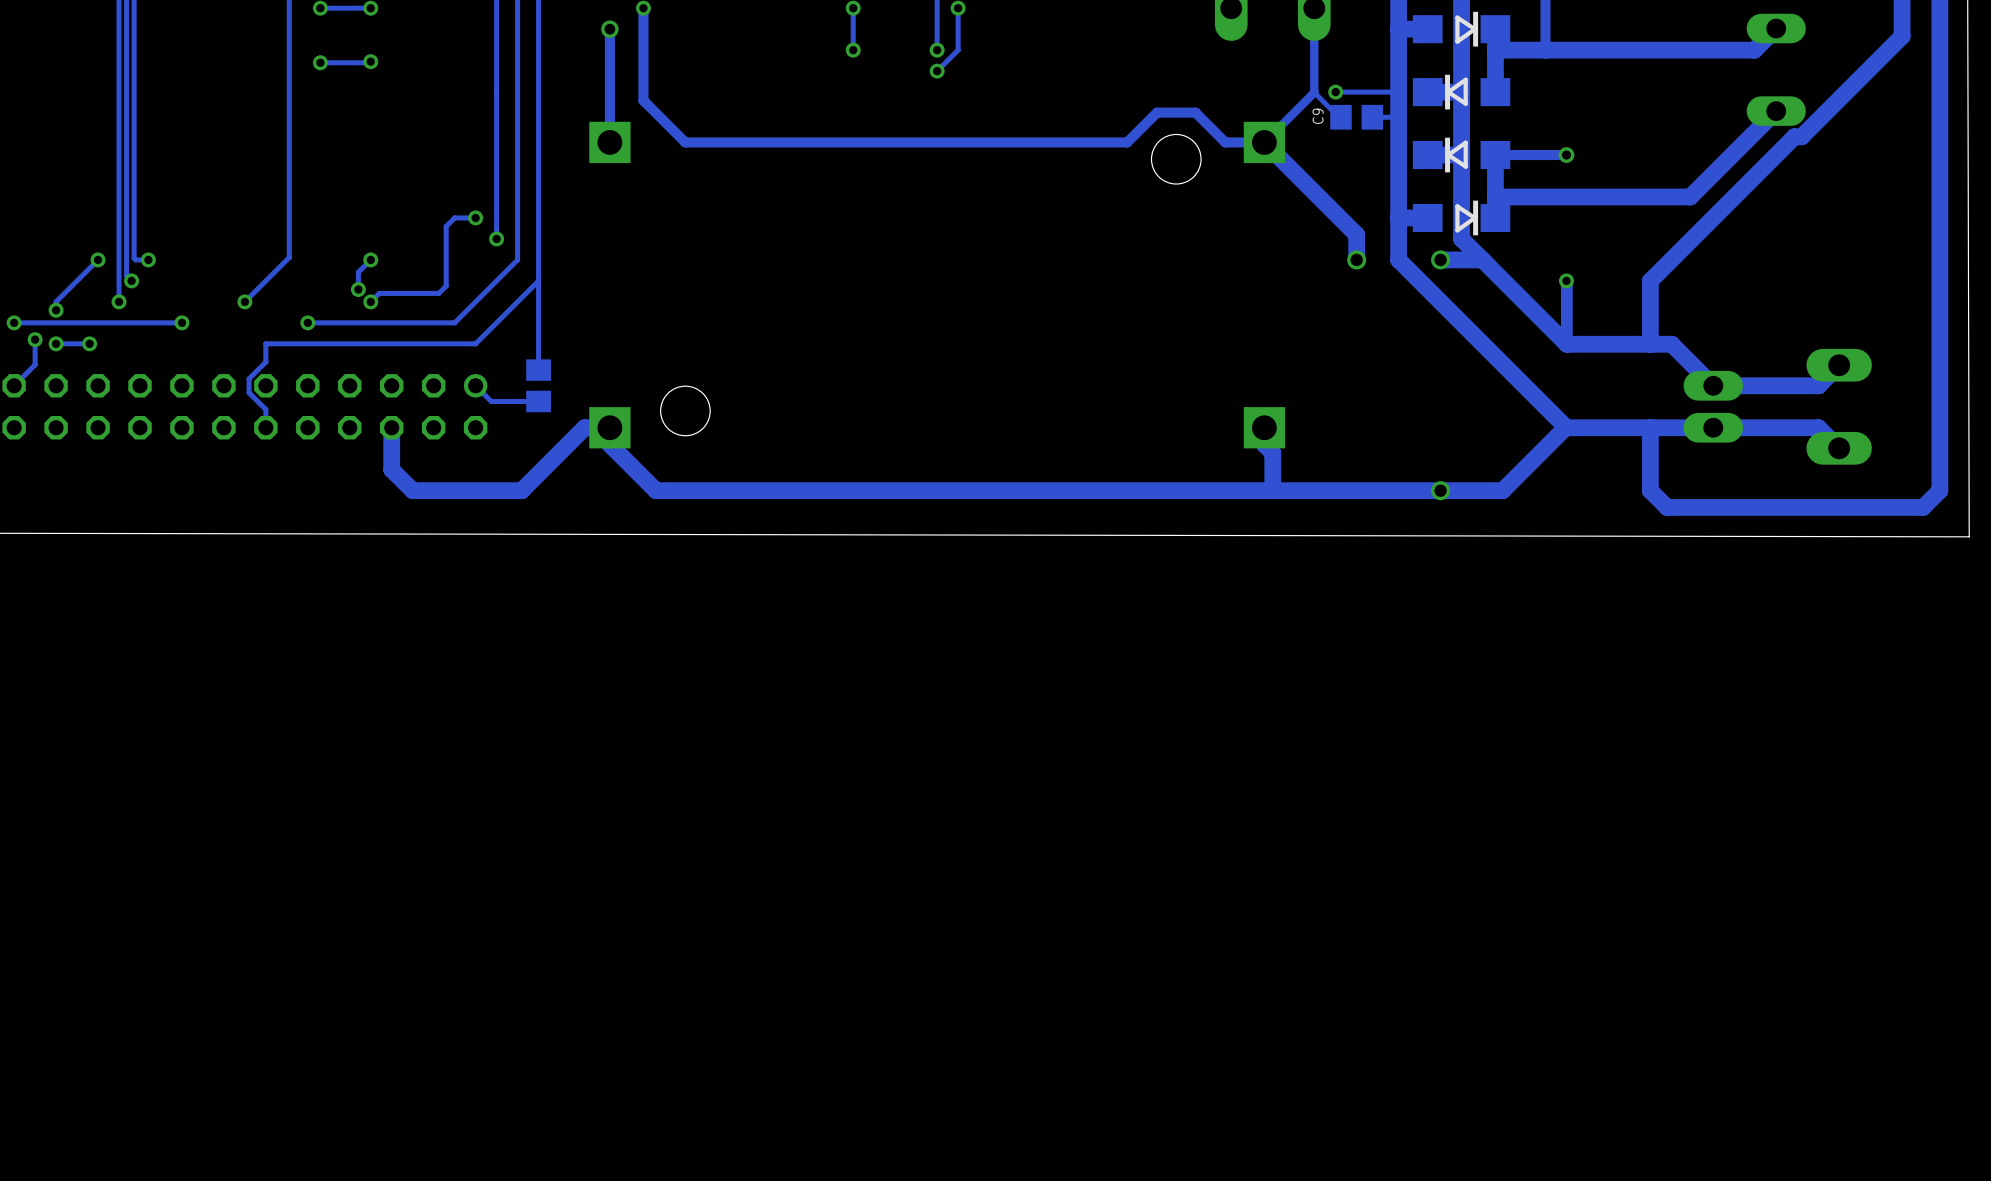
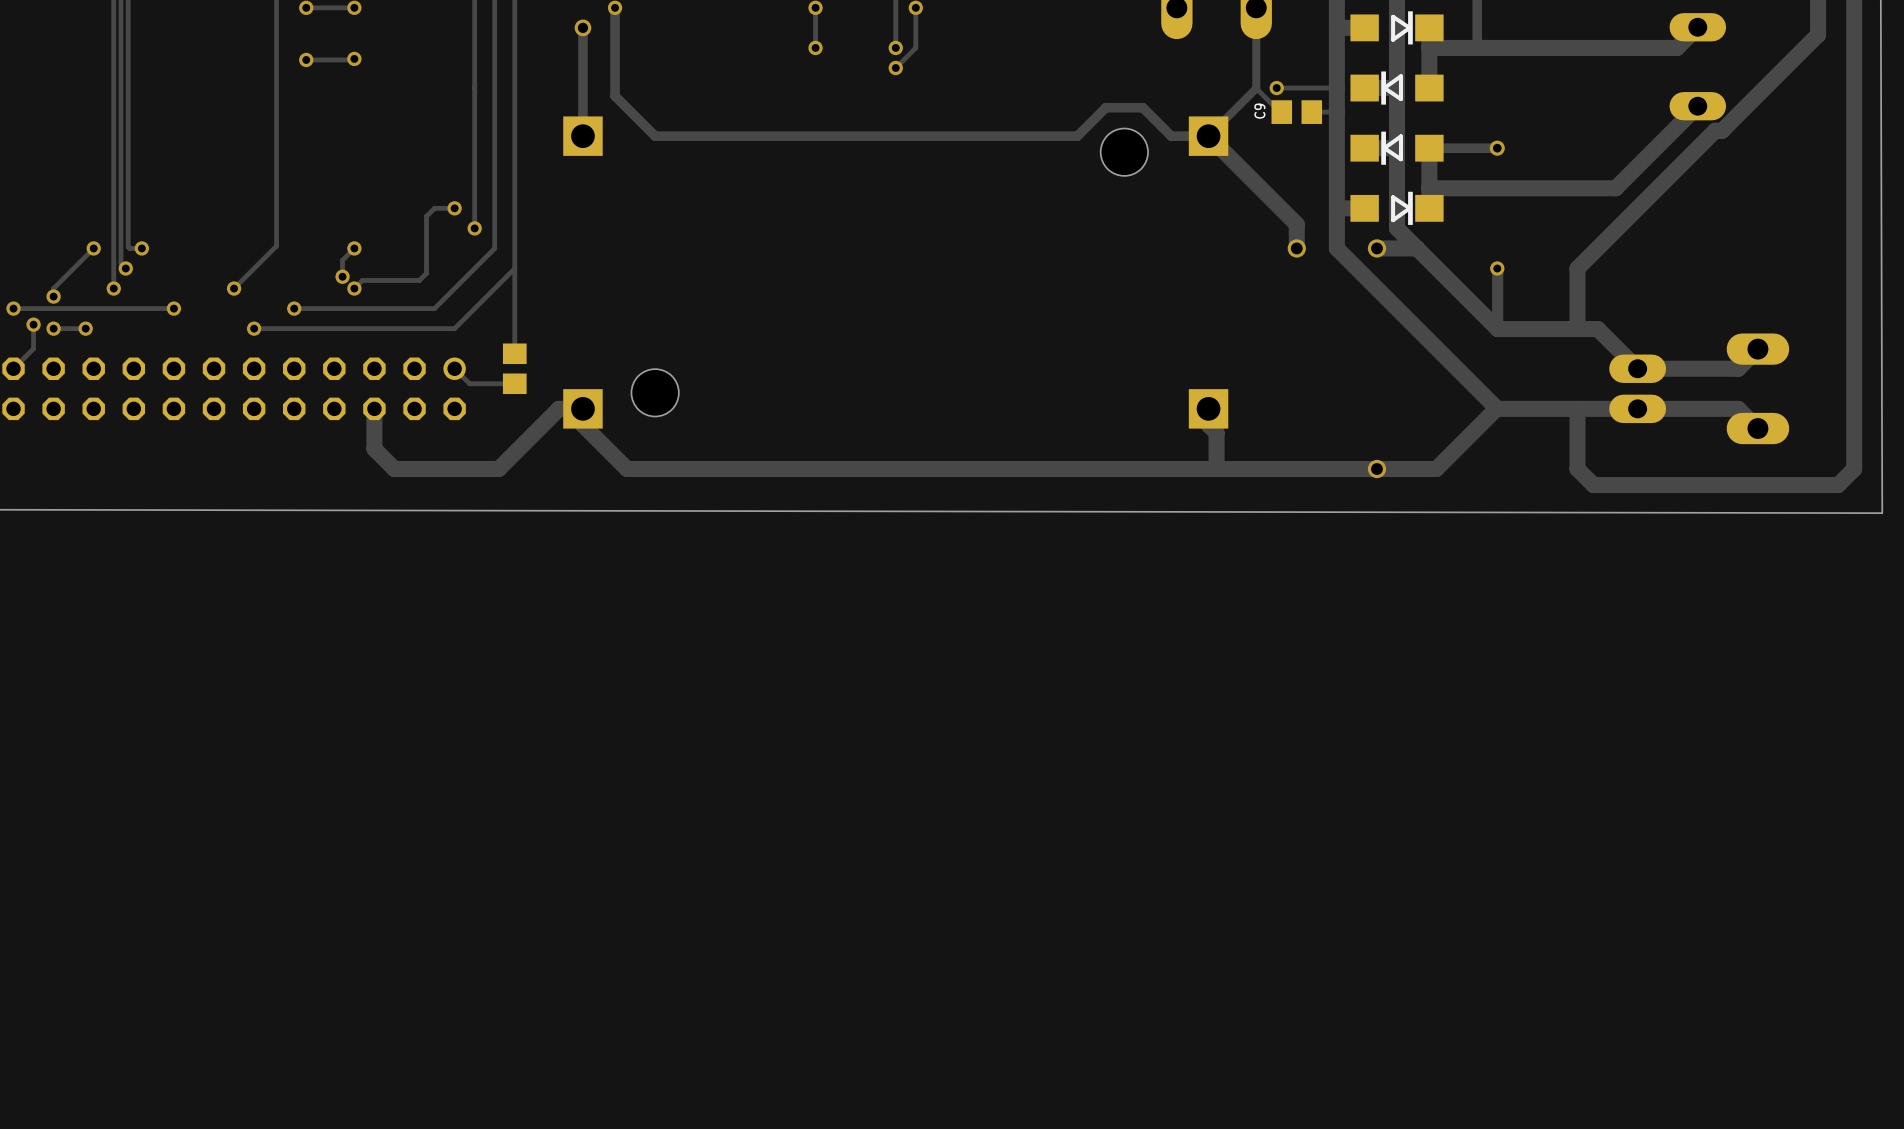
track: (265, 343) (265, 362) (249, 378) (249, 392) (265, 409) (265, 427) -> none
via: none -> (254, 328)

